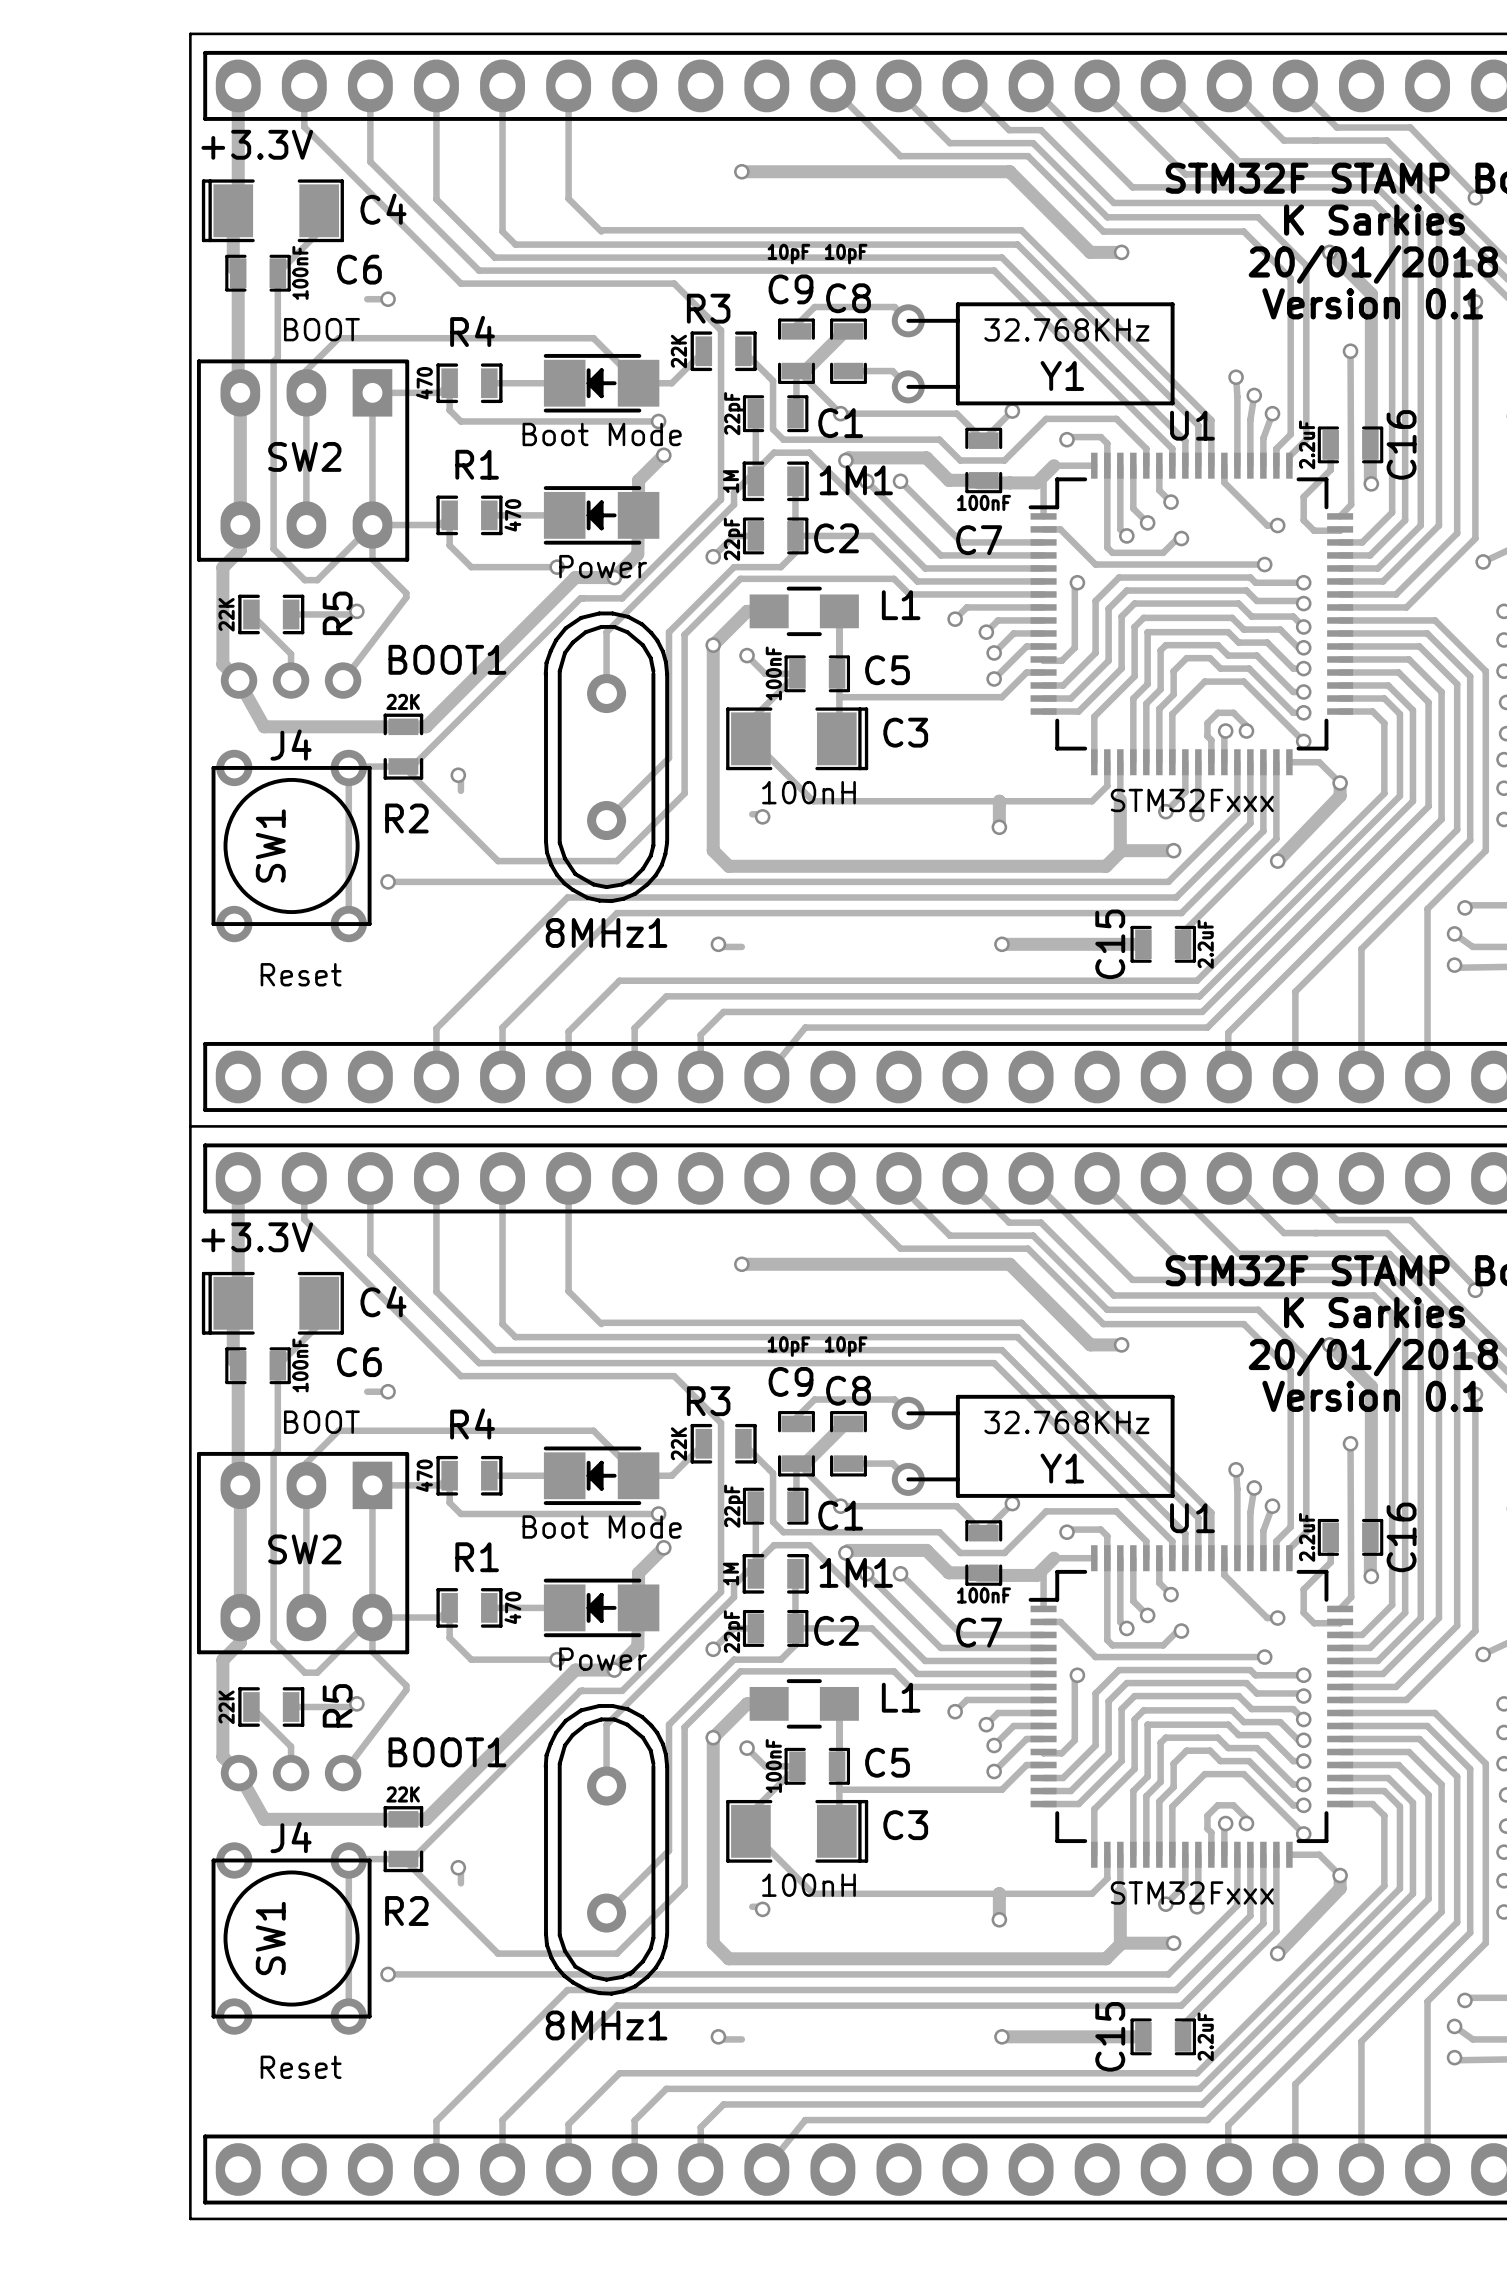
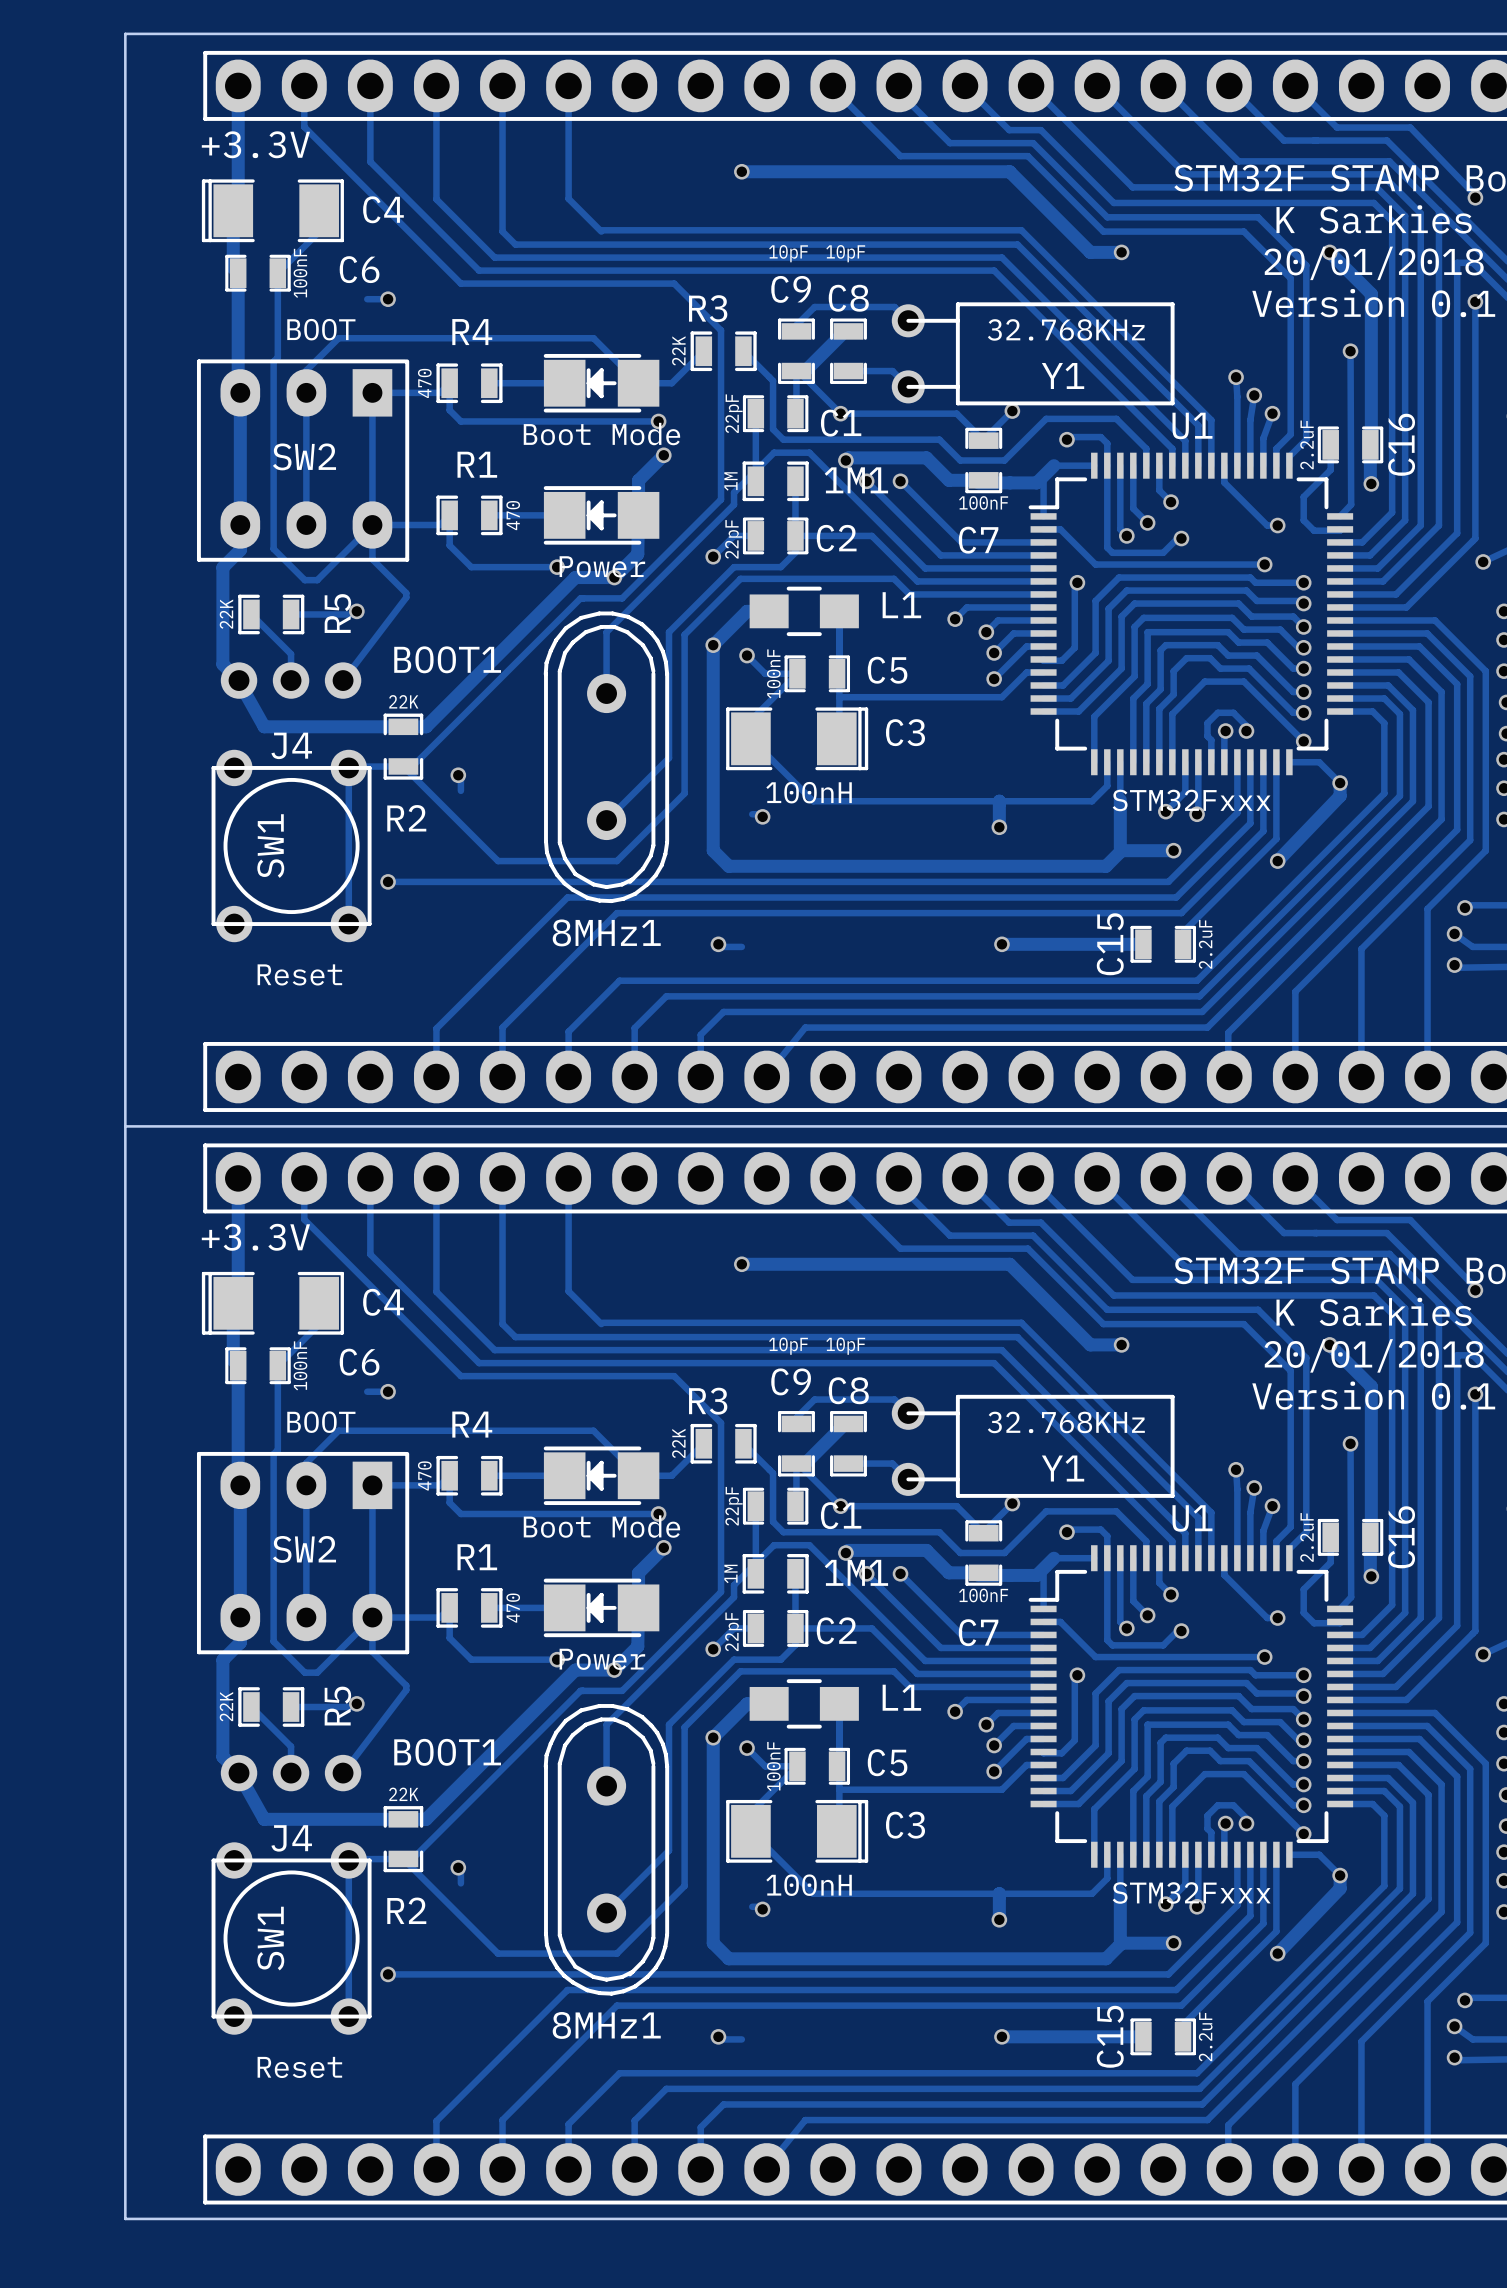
board edge: (190, 33) (190, 2218) -> (190, 33) (125, 33) (125, 2218) (190, 2218)
board edge: none -> (125, 1126) (190, 1126)

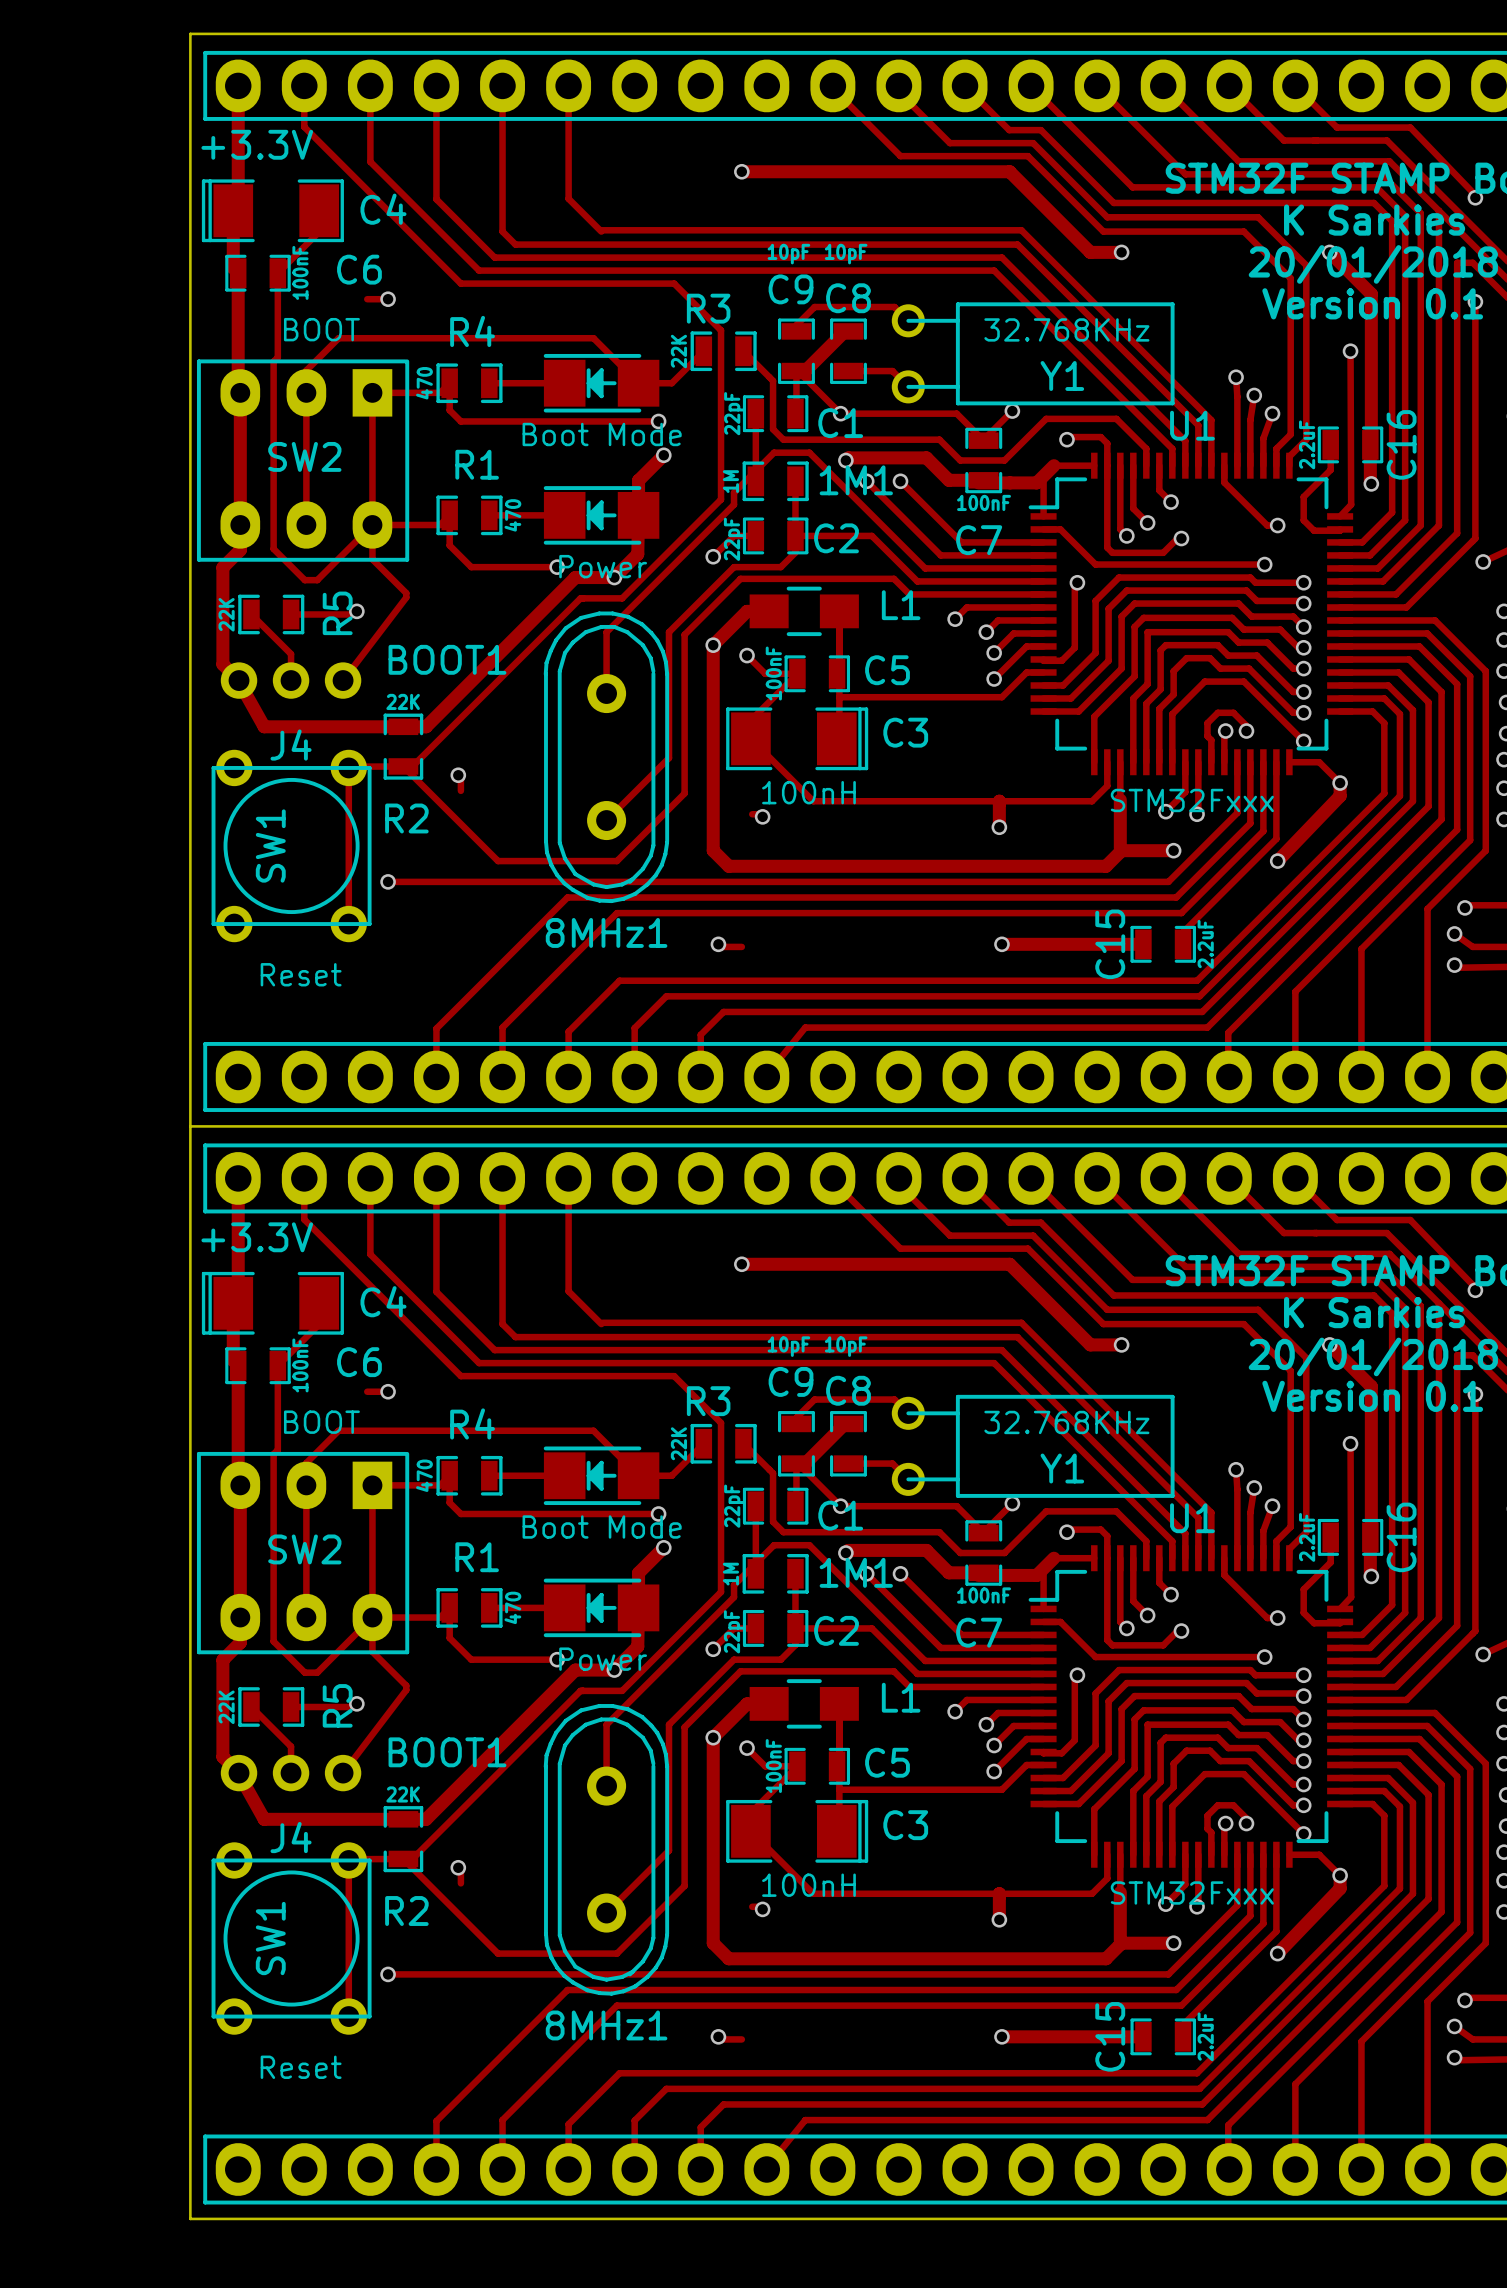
board edge: (190, 33) (125, 33) (125, 2218) (190, 2218) -> (190, 33) (190, 2218)
board edge: (125, 1126) (190, 1126) -> none

